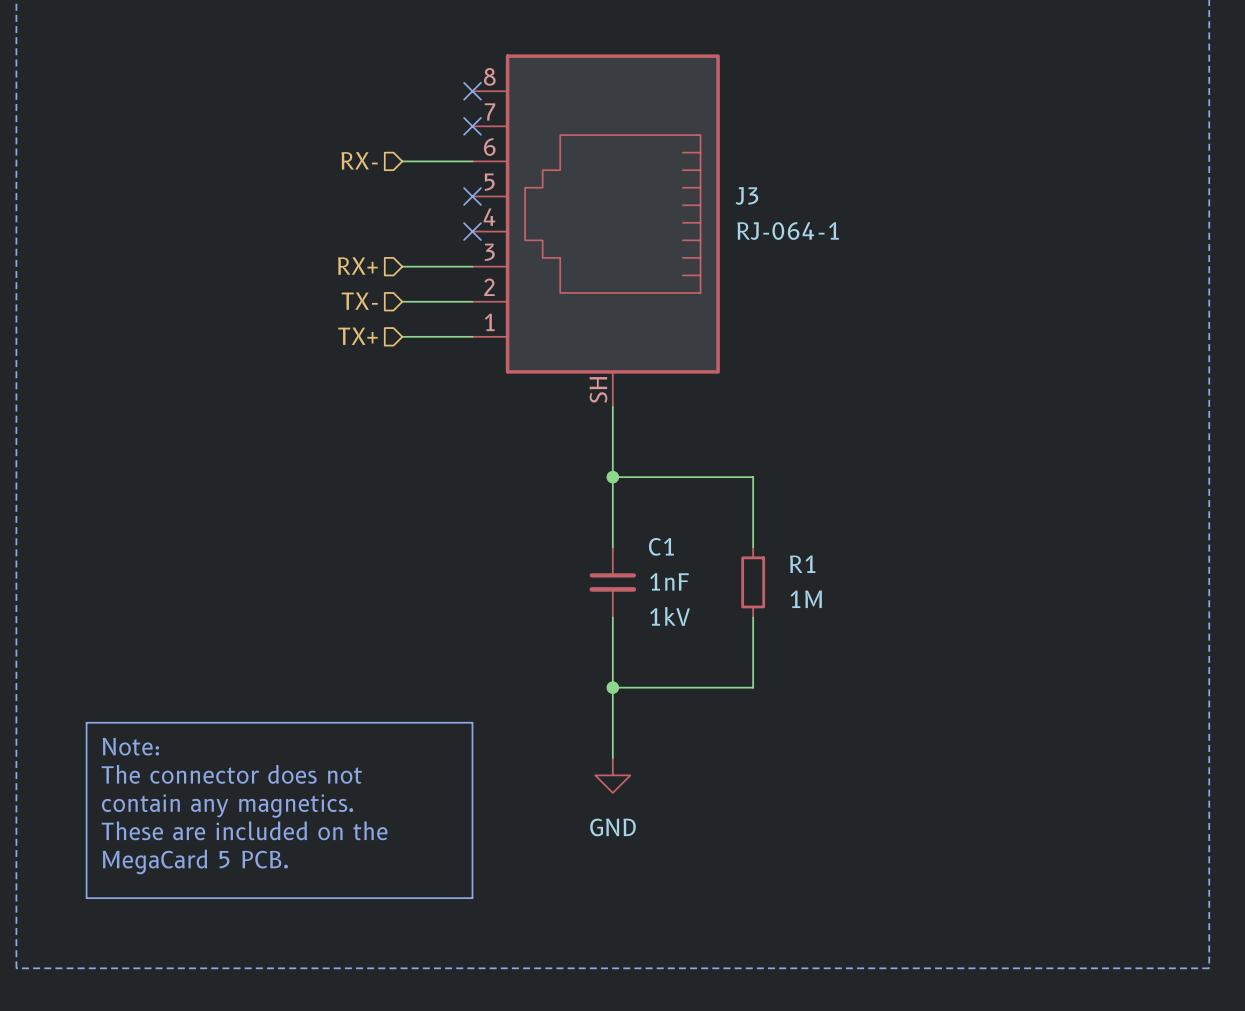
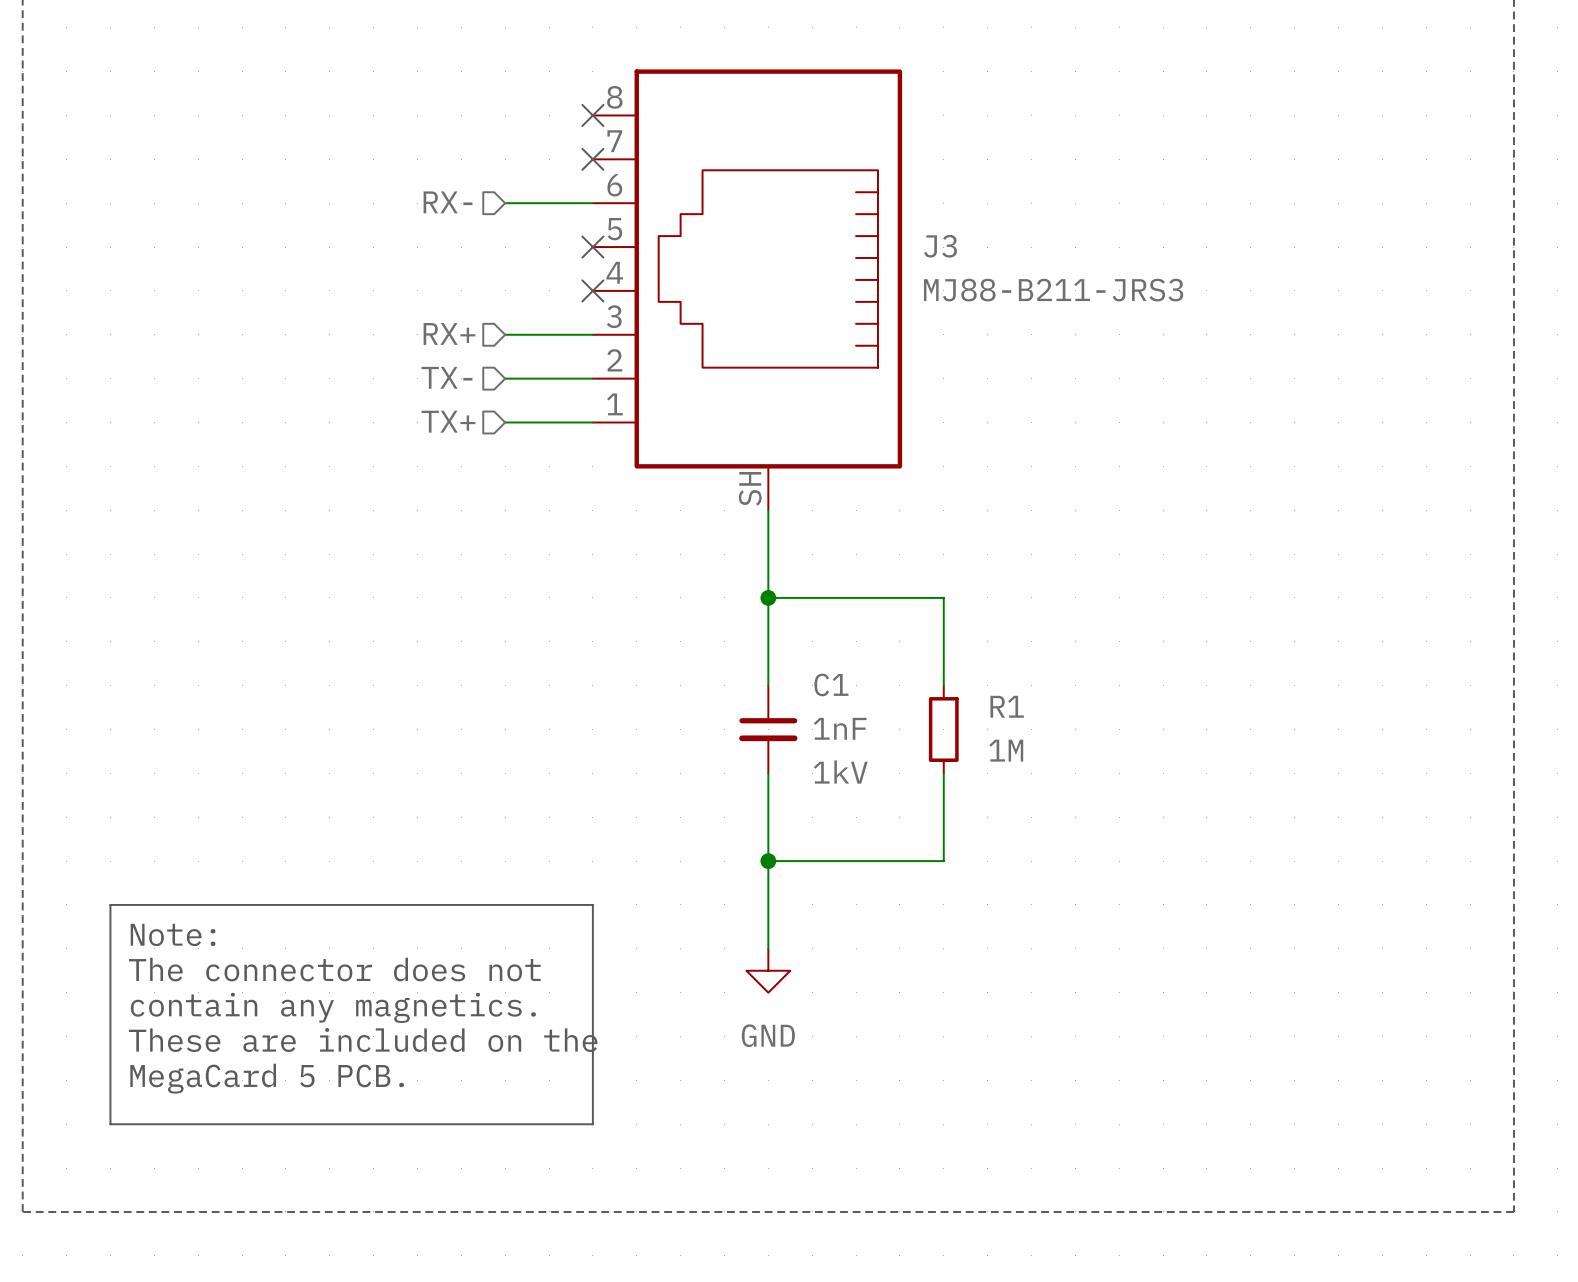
J3 value: RJ-064-1 (788, 231) -> MJ88-B211-JRS3 (1053, 290)

